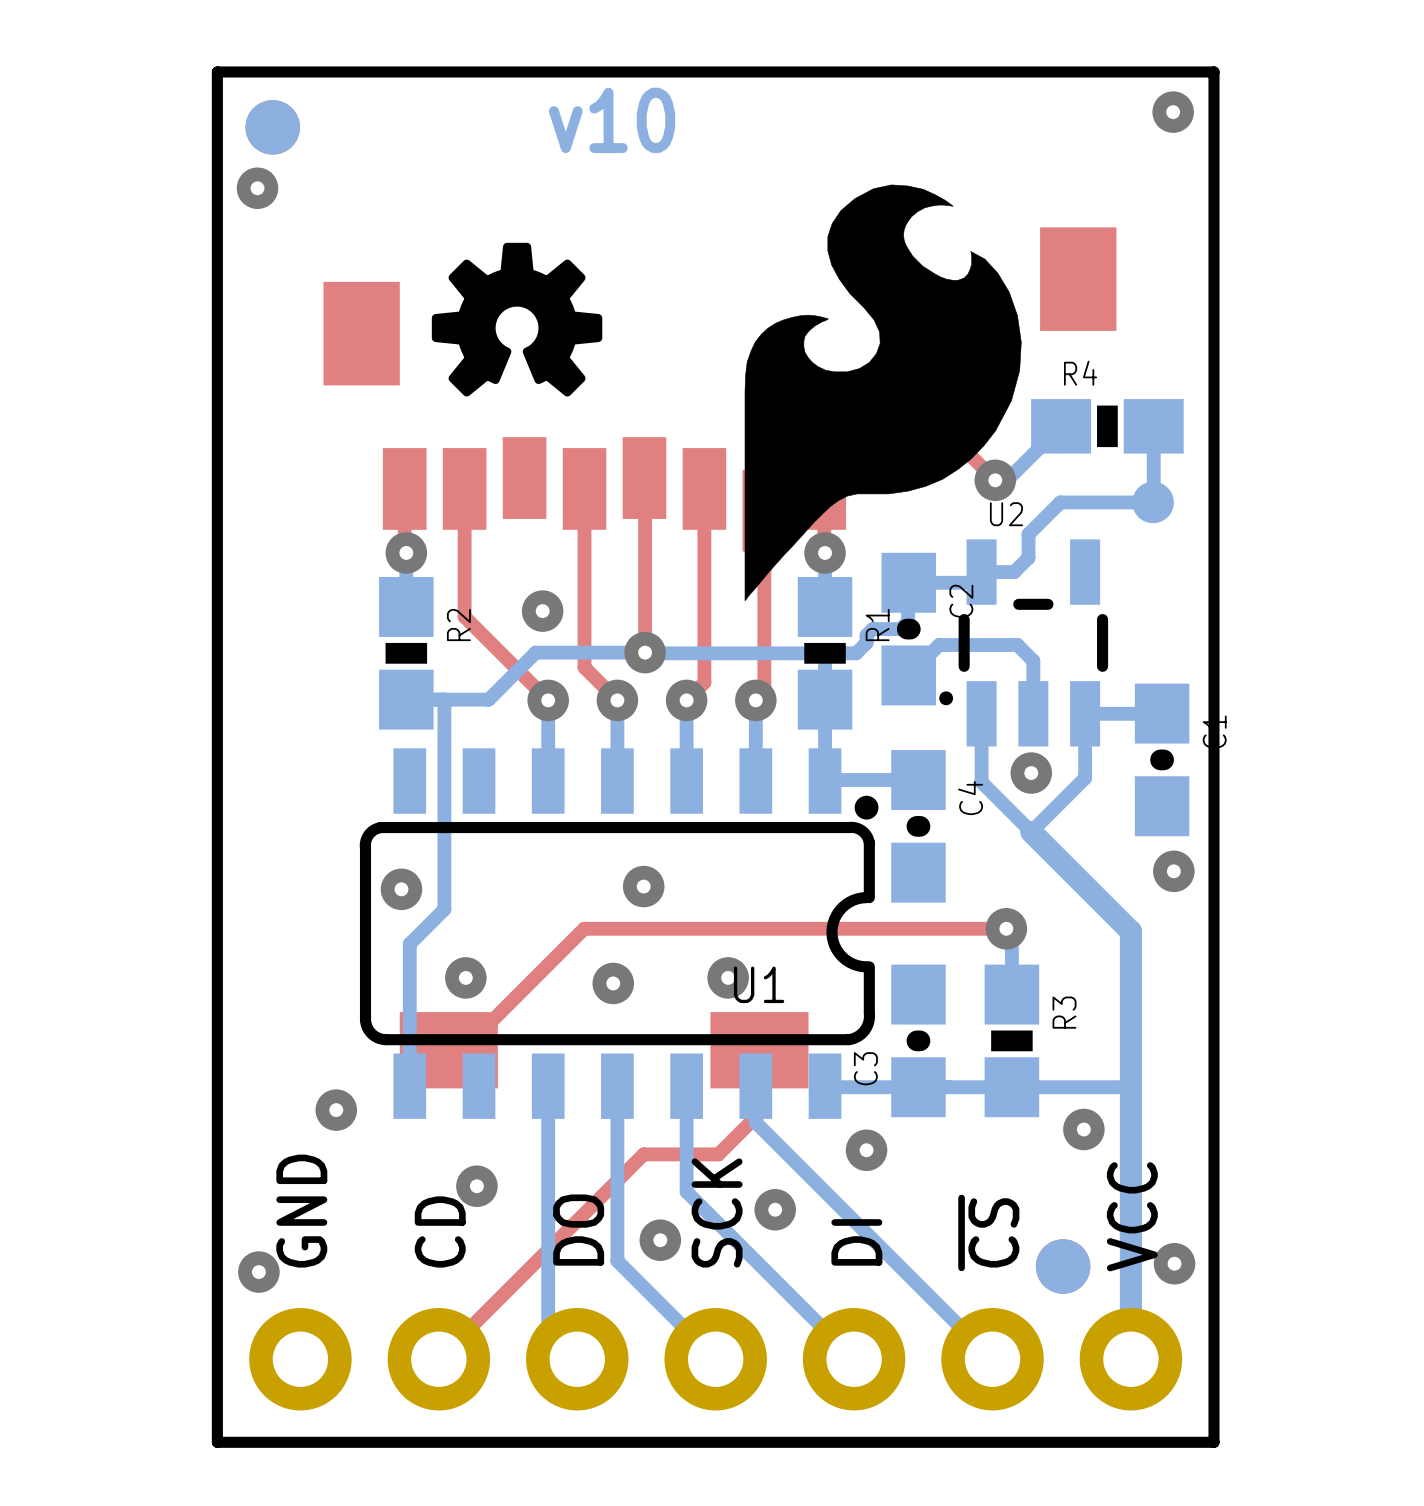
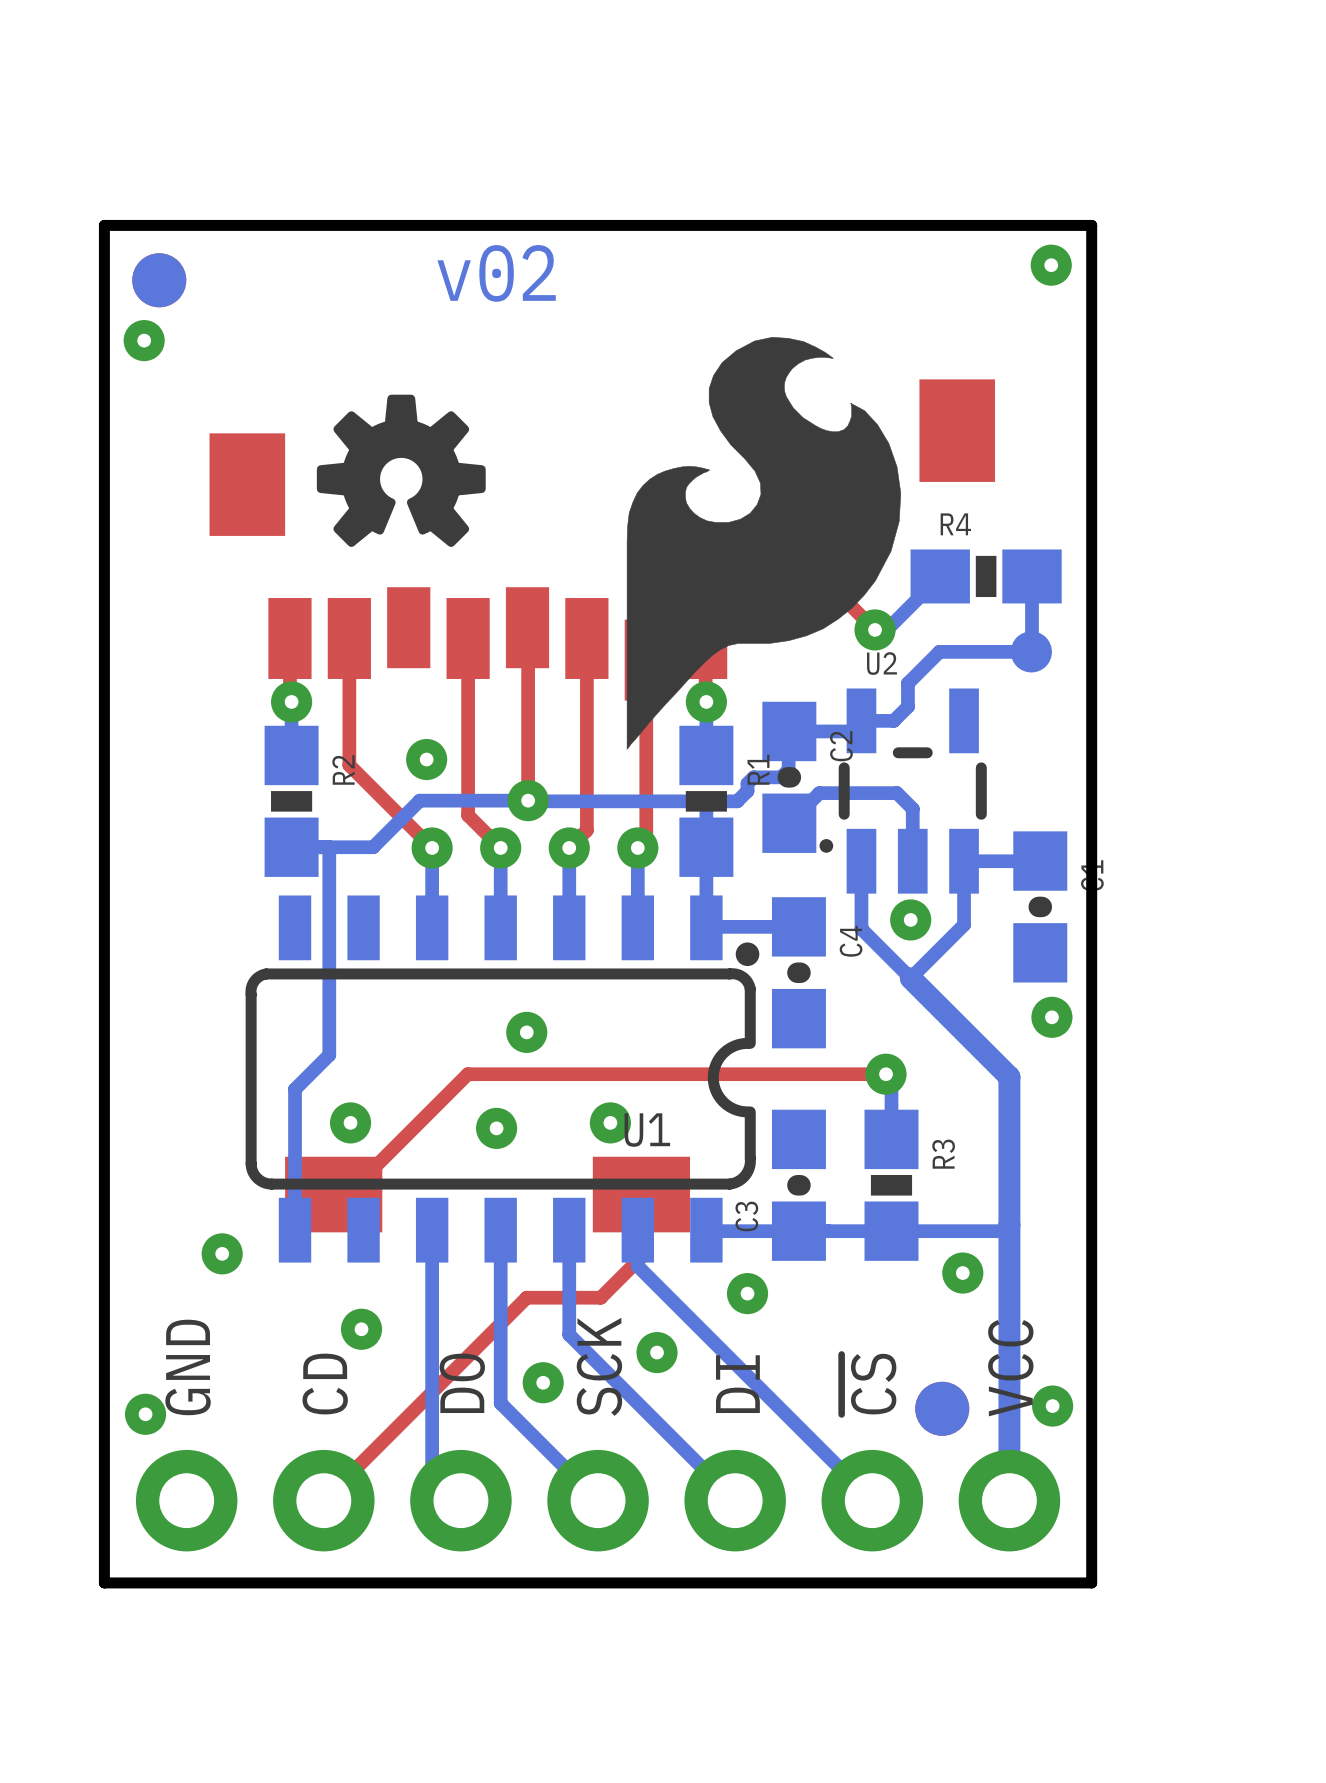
text: v10 (612, 120) -> v02 (496, 273)
via: (401, 889) -> none

